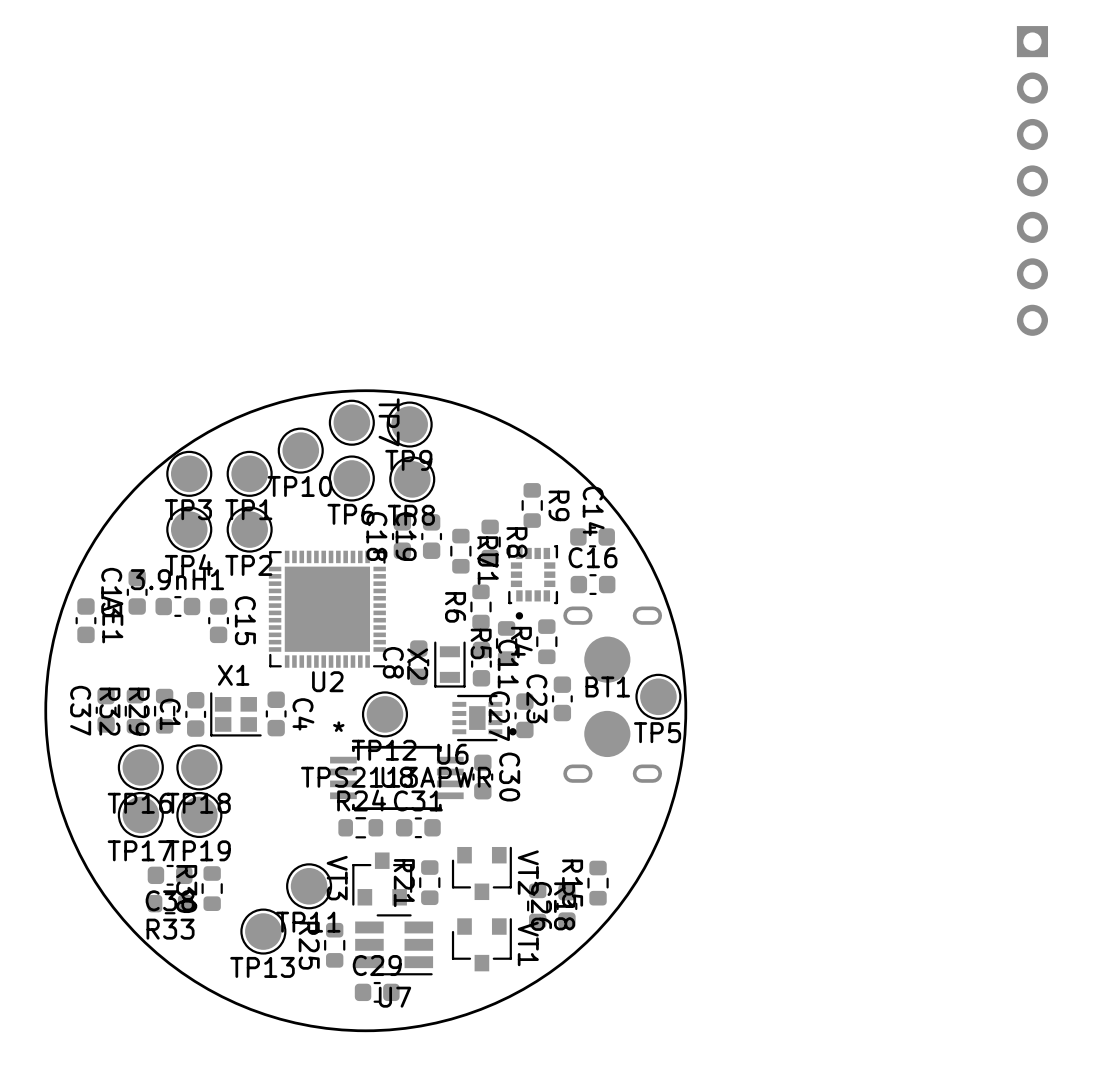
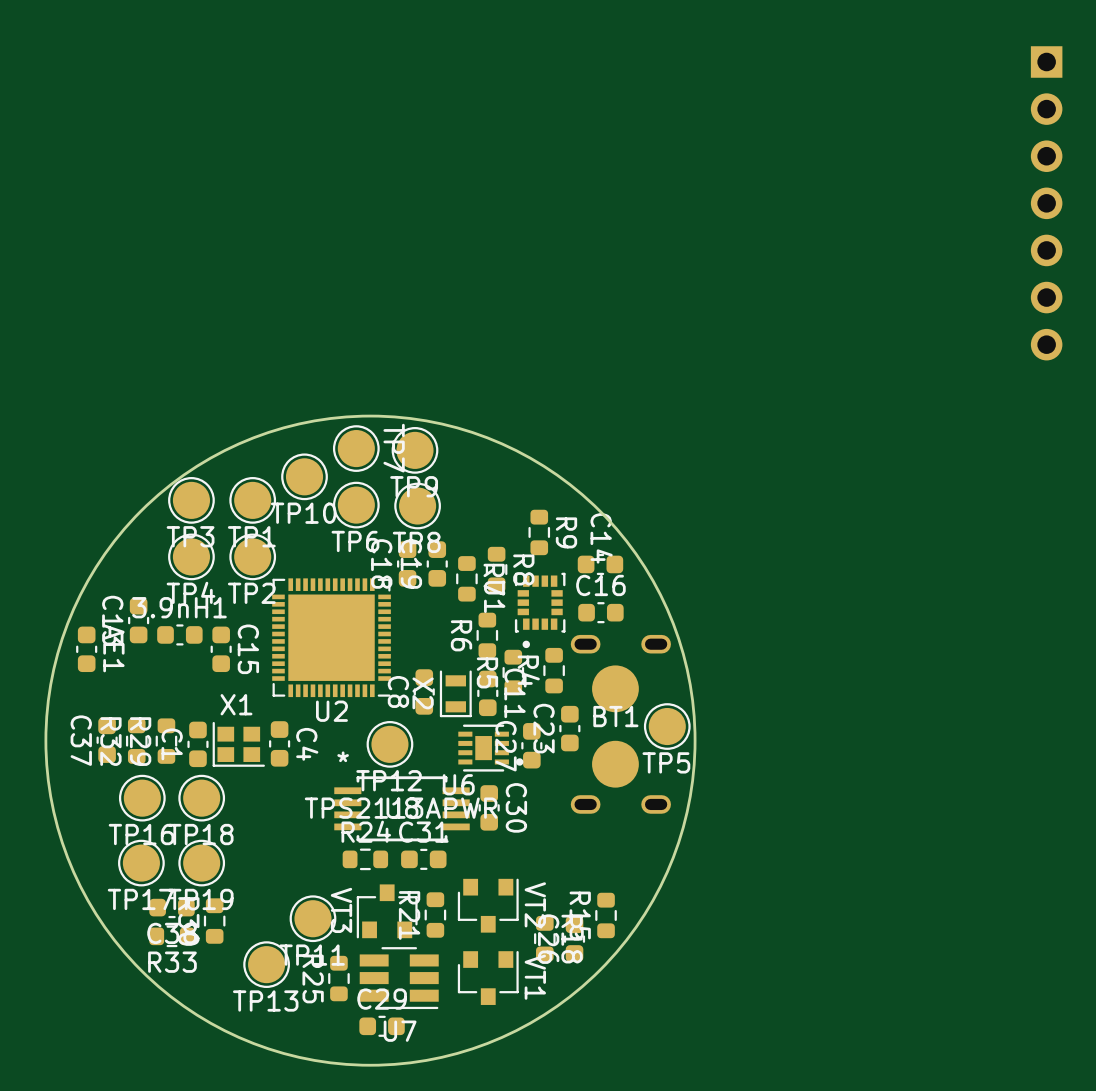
TP17 position: (140, 814) -> (141, 863)
TP19 position: (199, 814) -> (201, 863)

